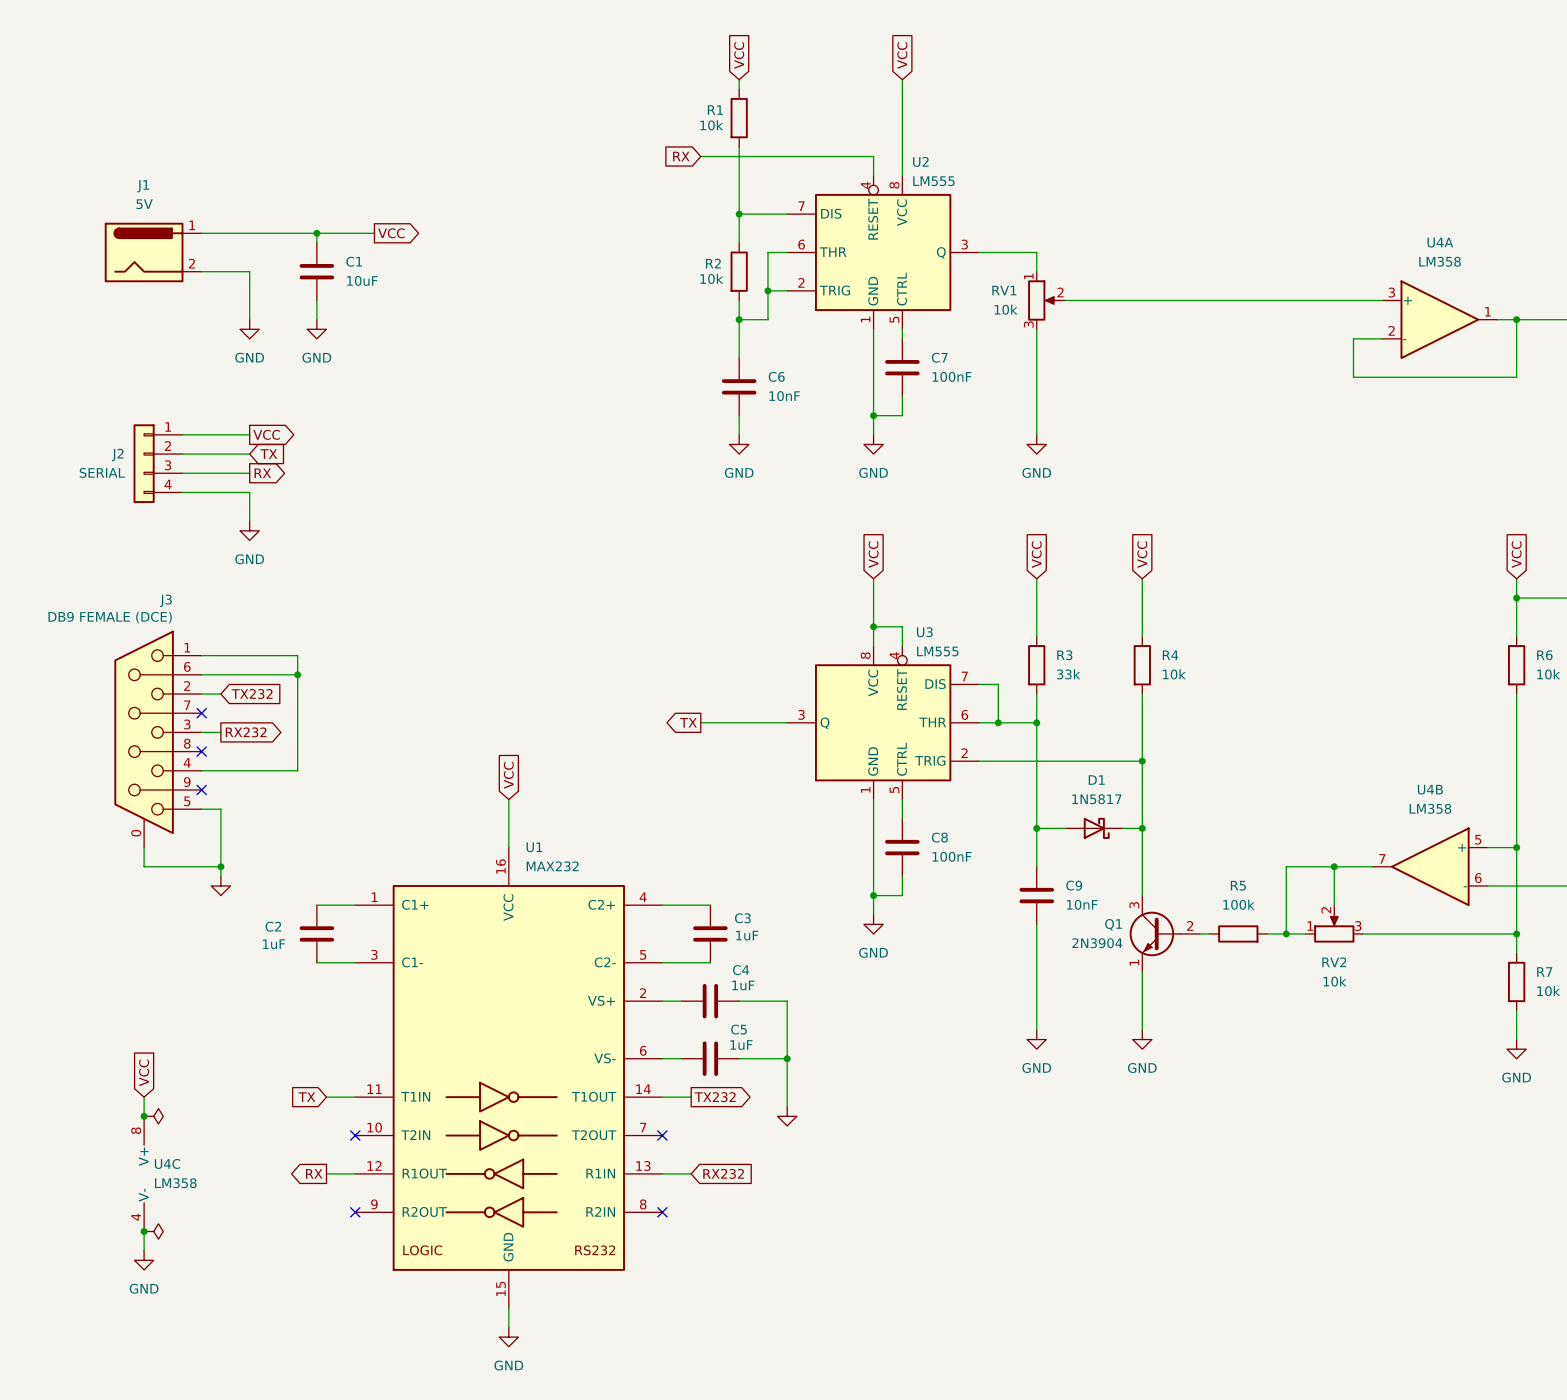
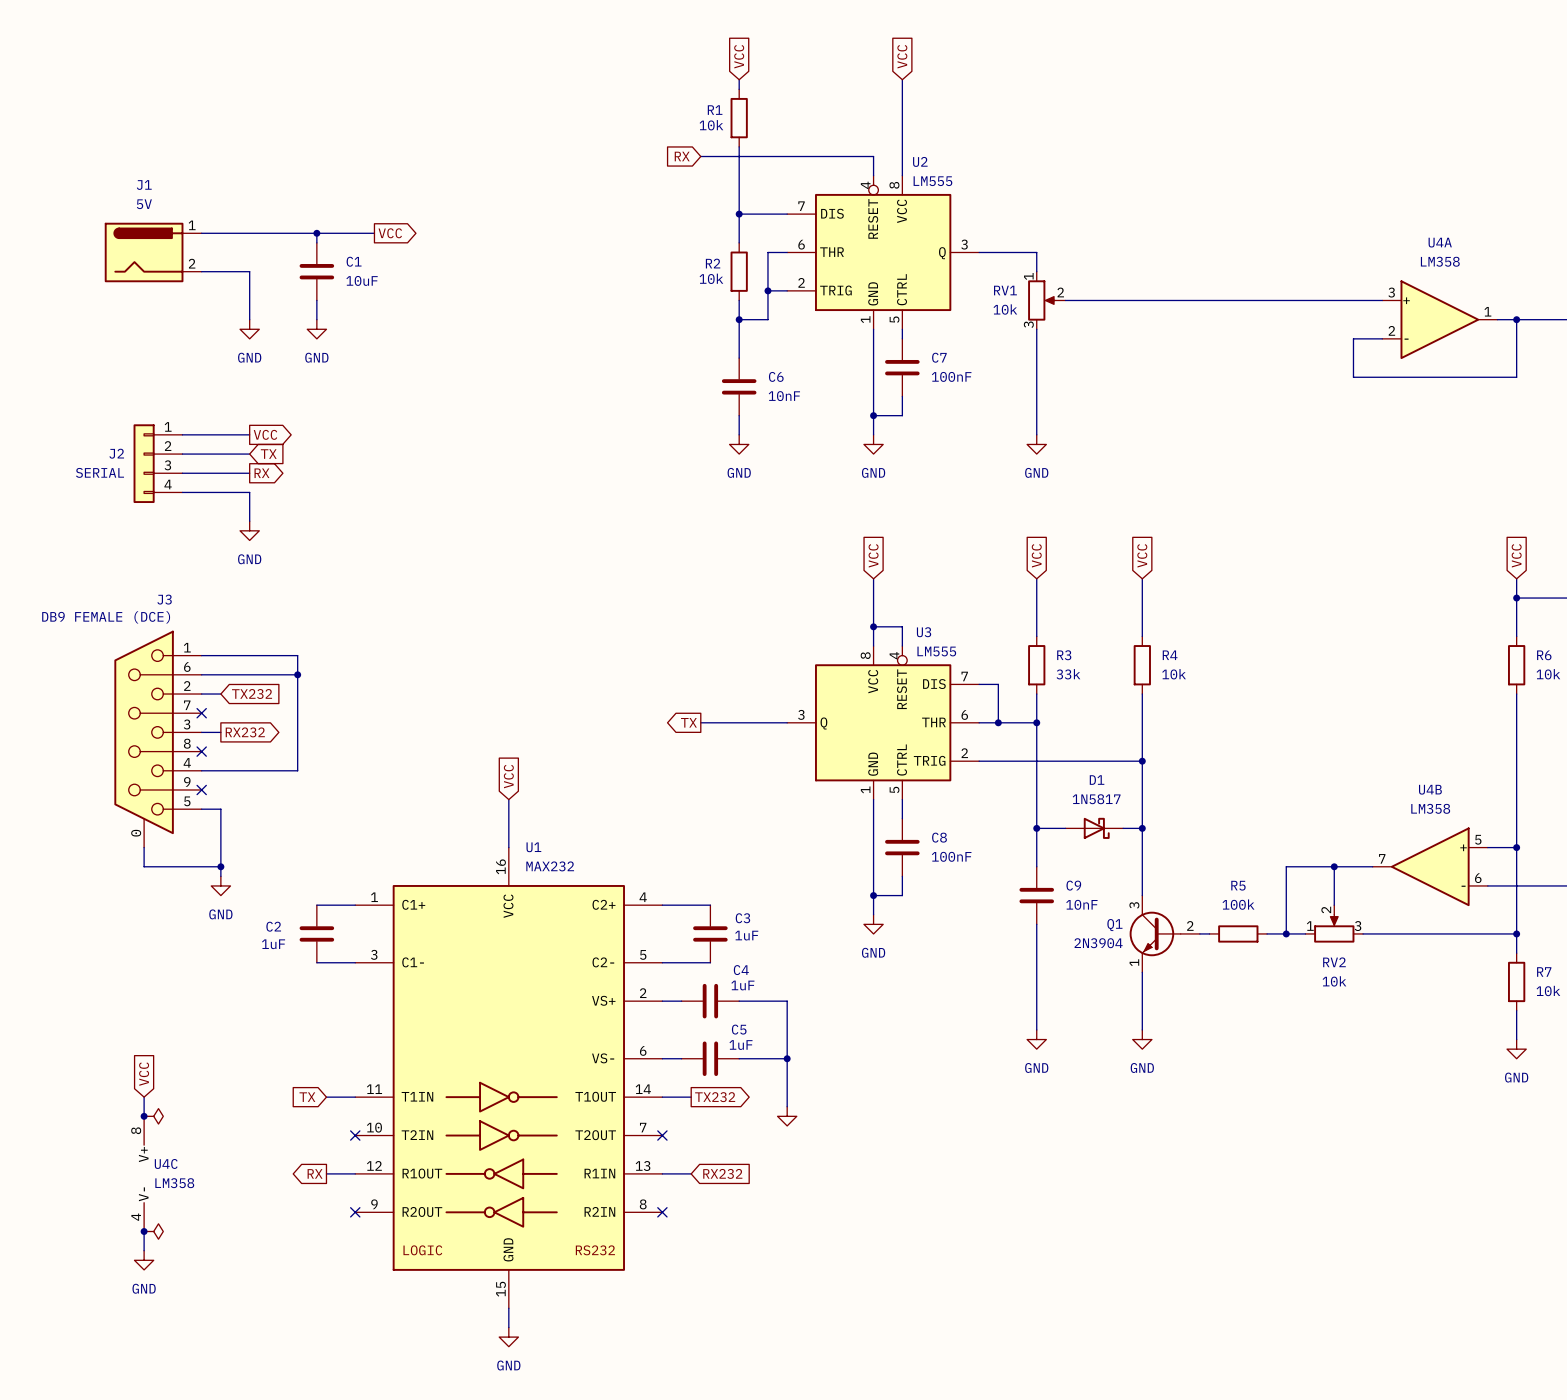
power symbol text: none -> GND (220, 914)

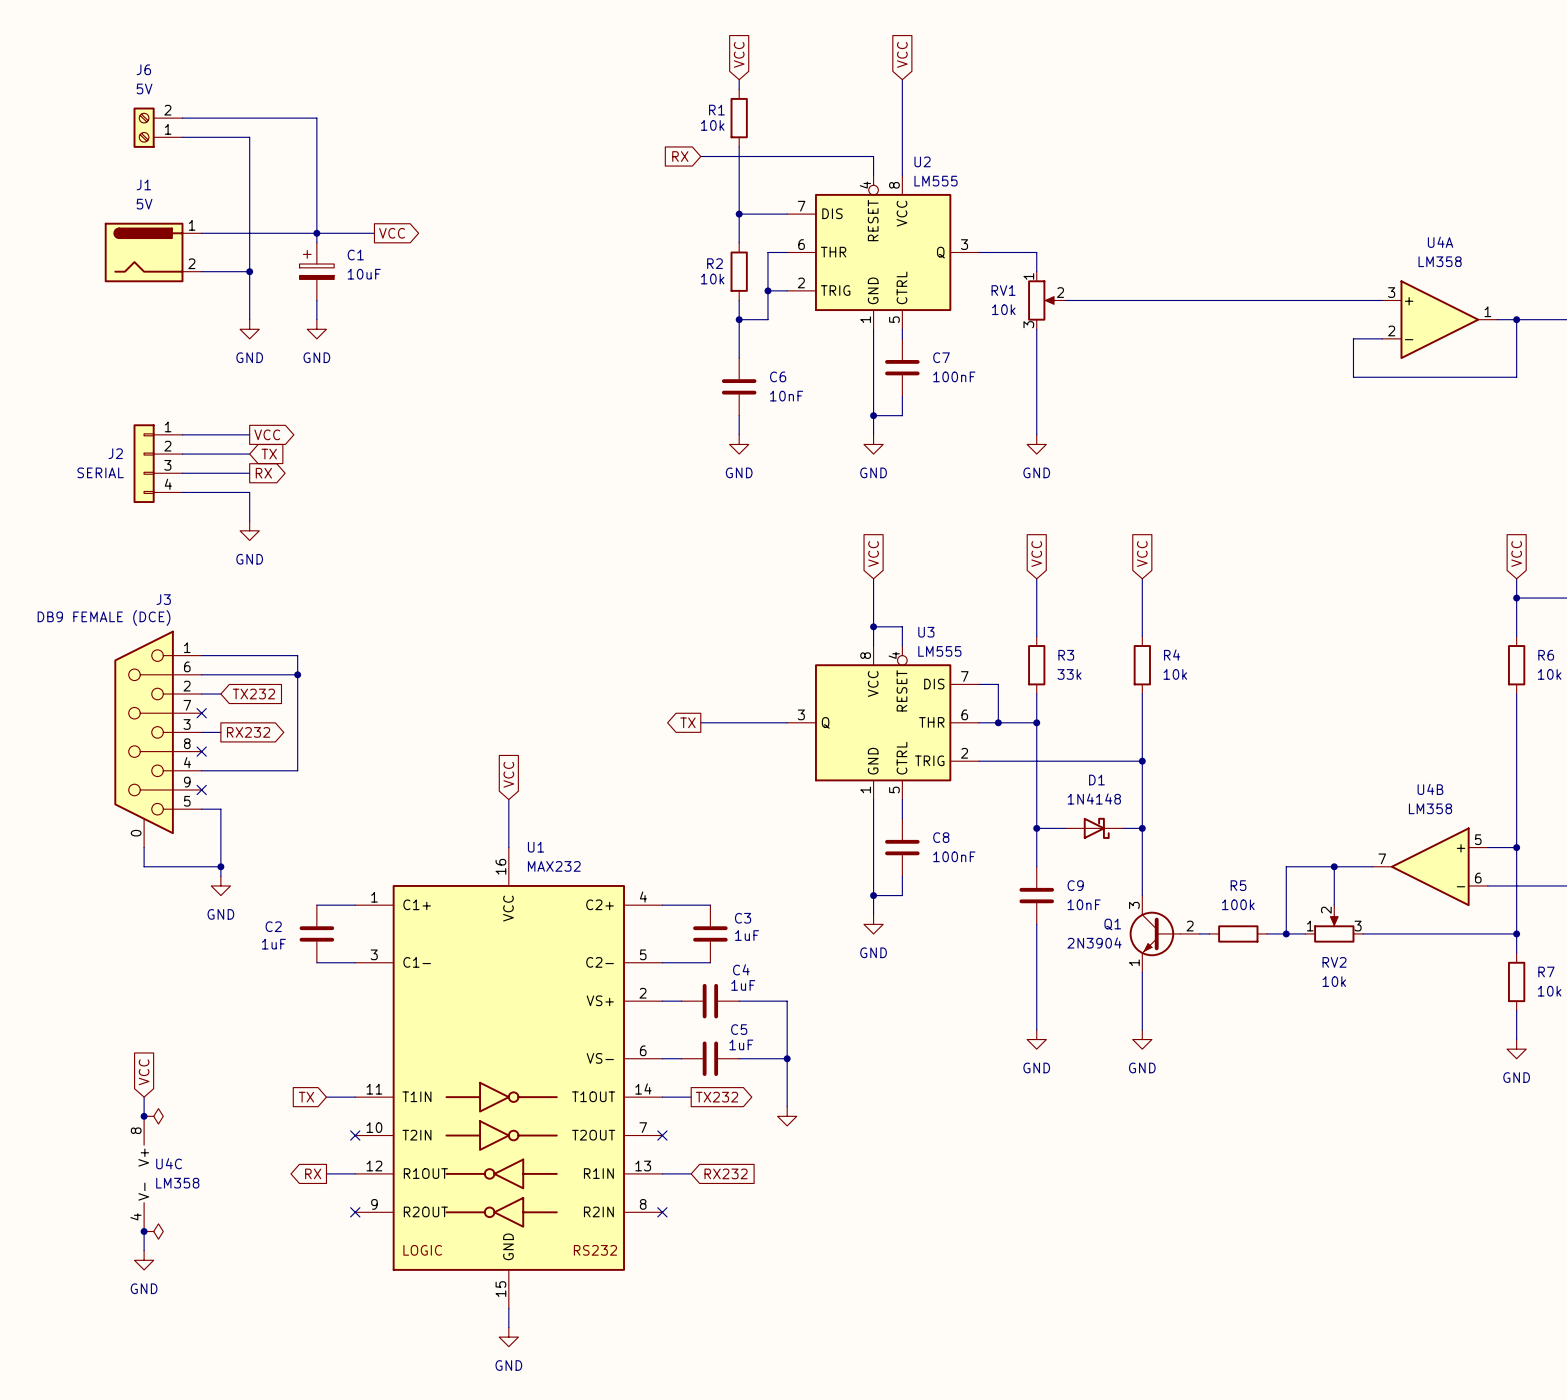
wire: none -> (182, 118) (316, 118) (316, 233)
J6: none -> 5V (158, 127)
wire: none -> (182, 137) (249, 137) (249, 271)
C1 symbol: [299, 242, 335, 301] -> [299, 242, 335, 301]
junction: none -> (249, 271)
D1 value: 1N5817 (1096, 799) -> 1N4148 (1094, 799)

